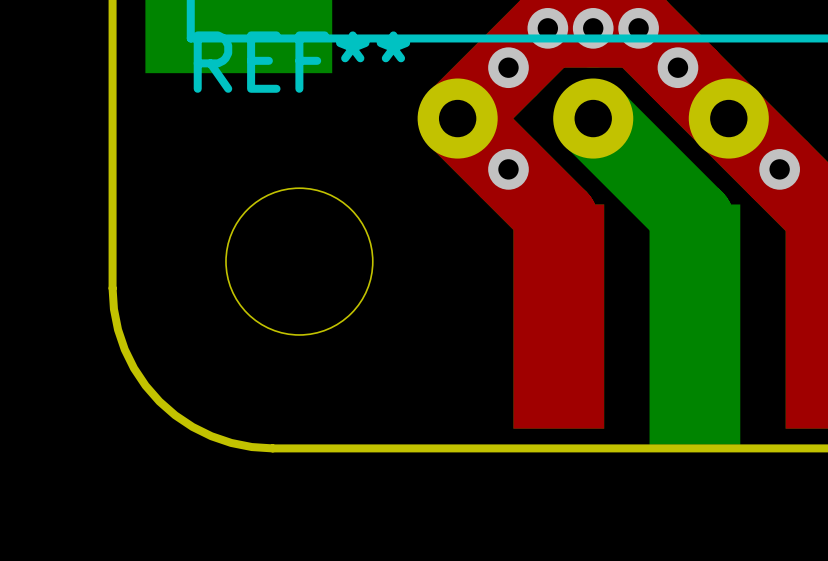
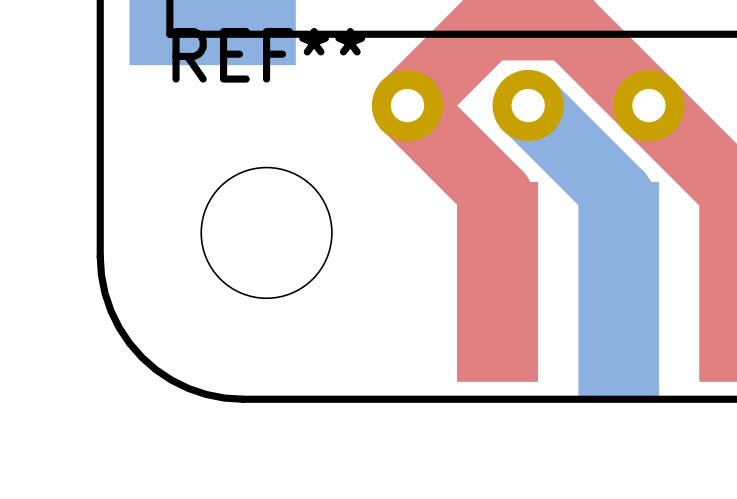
via: (547, 28) -> none
via: (593, 28) -> none
via: (638, 28) -> none
via: (508, 67) -> none
via: (677, 67) -> none
via: (508, 169) -> none
via: (779, 169) -> none

